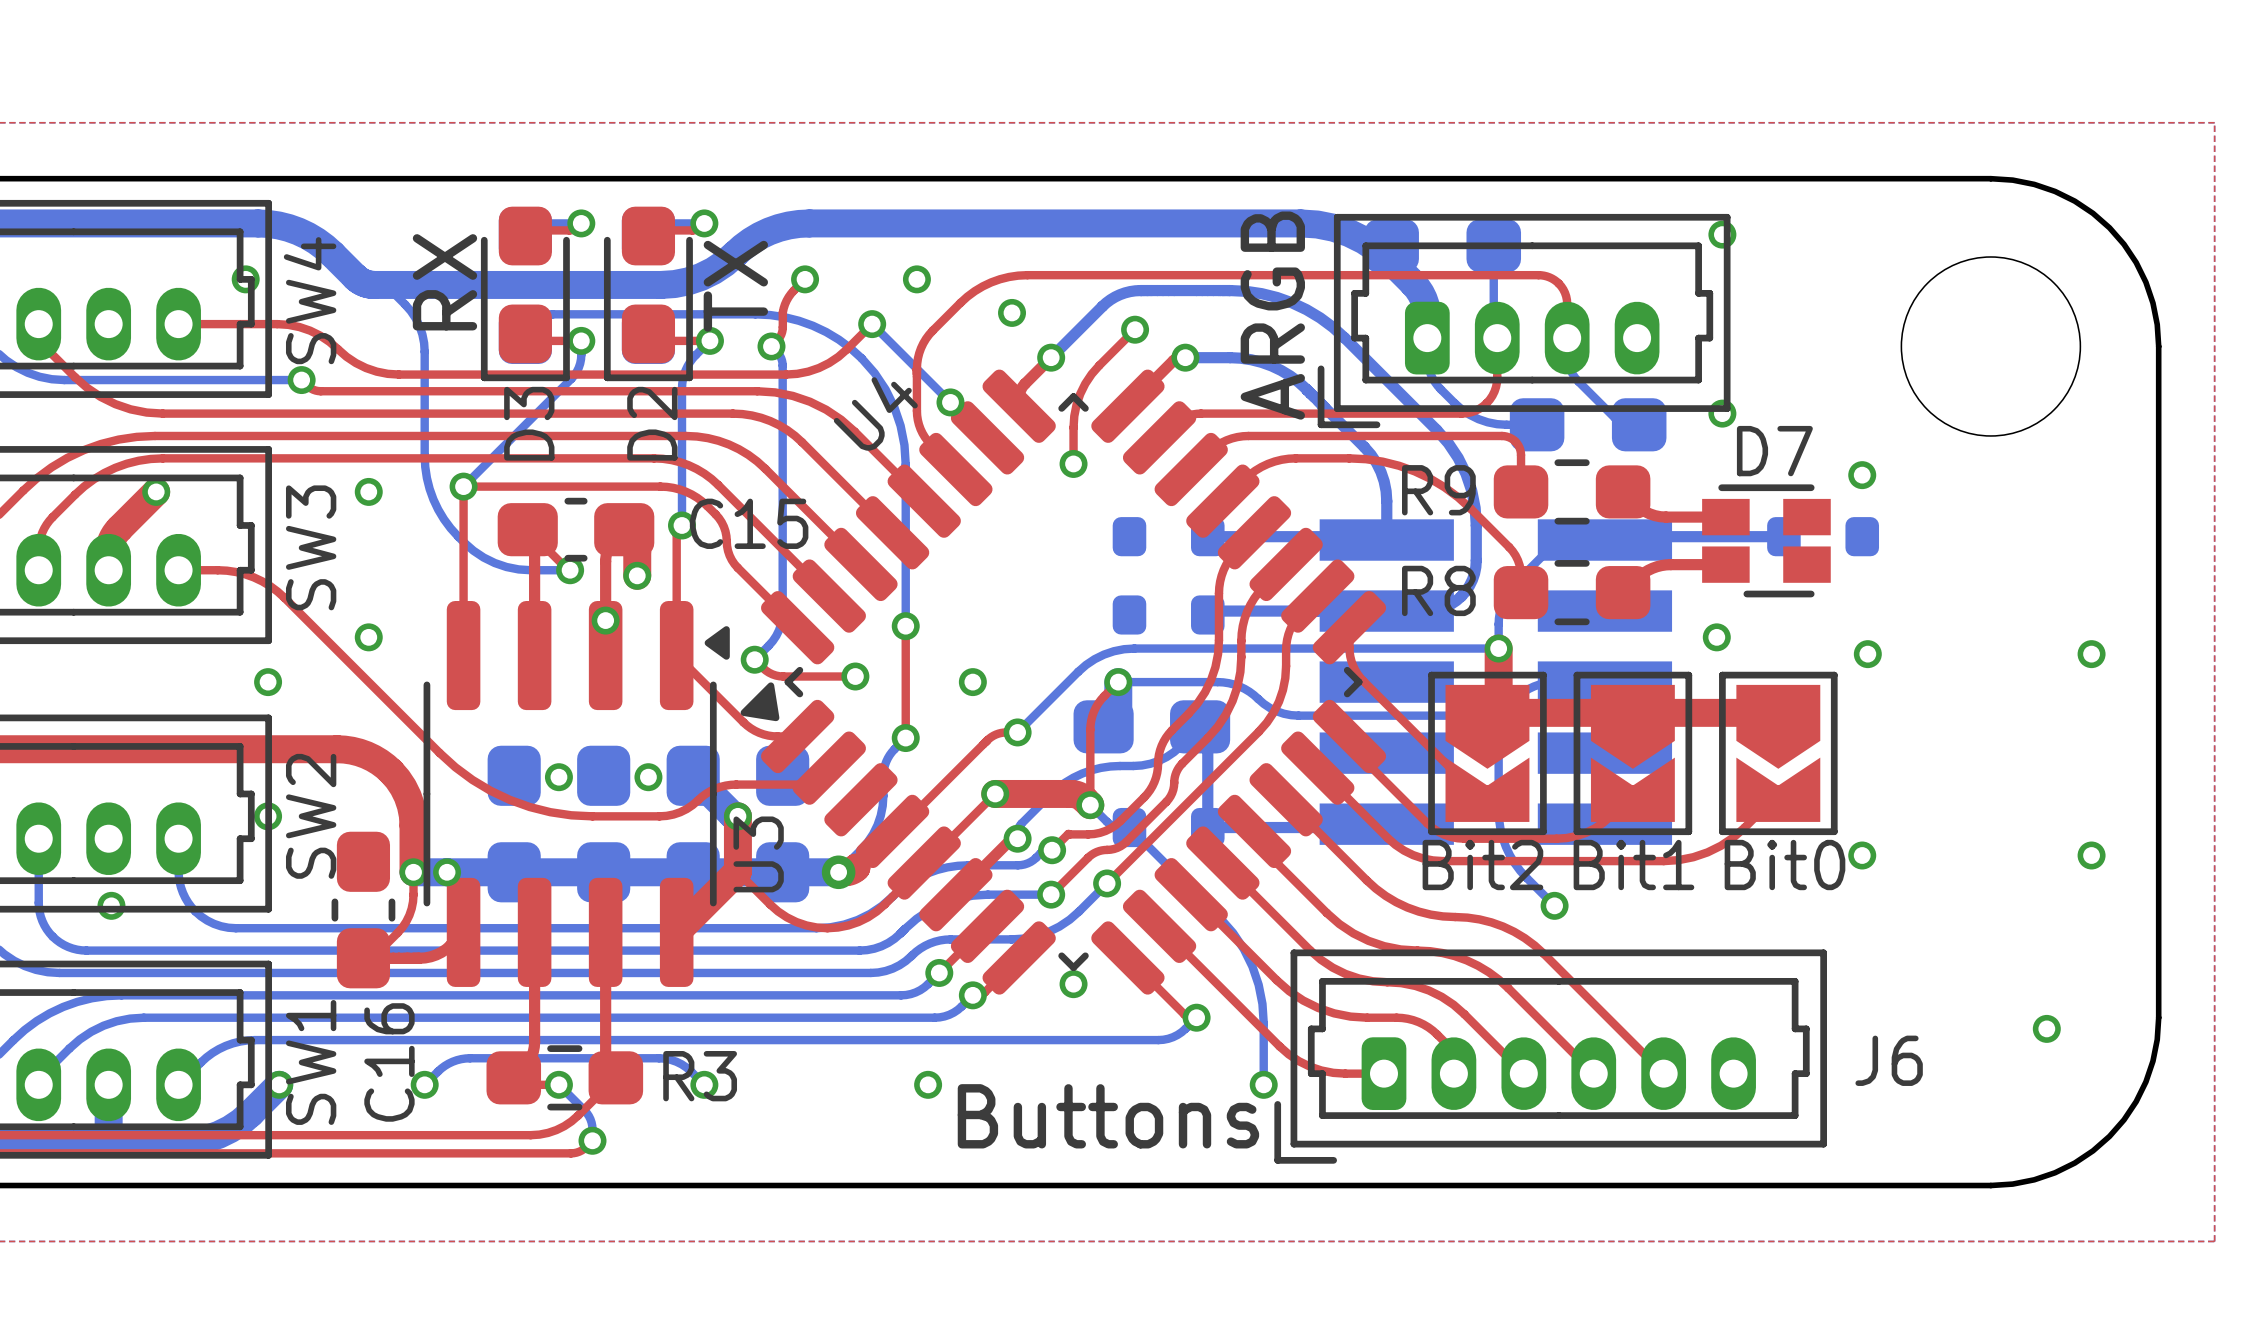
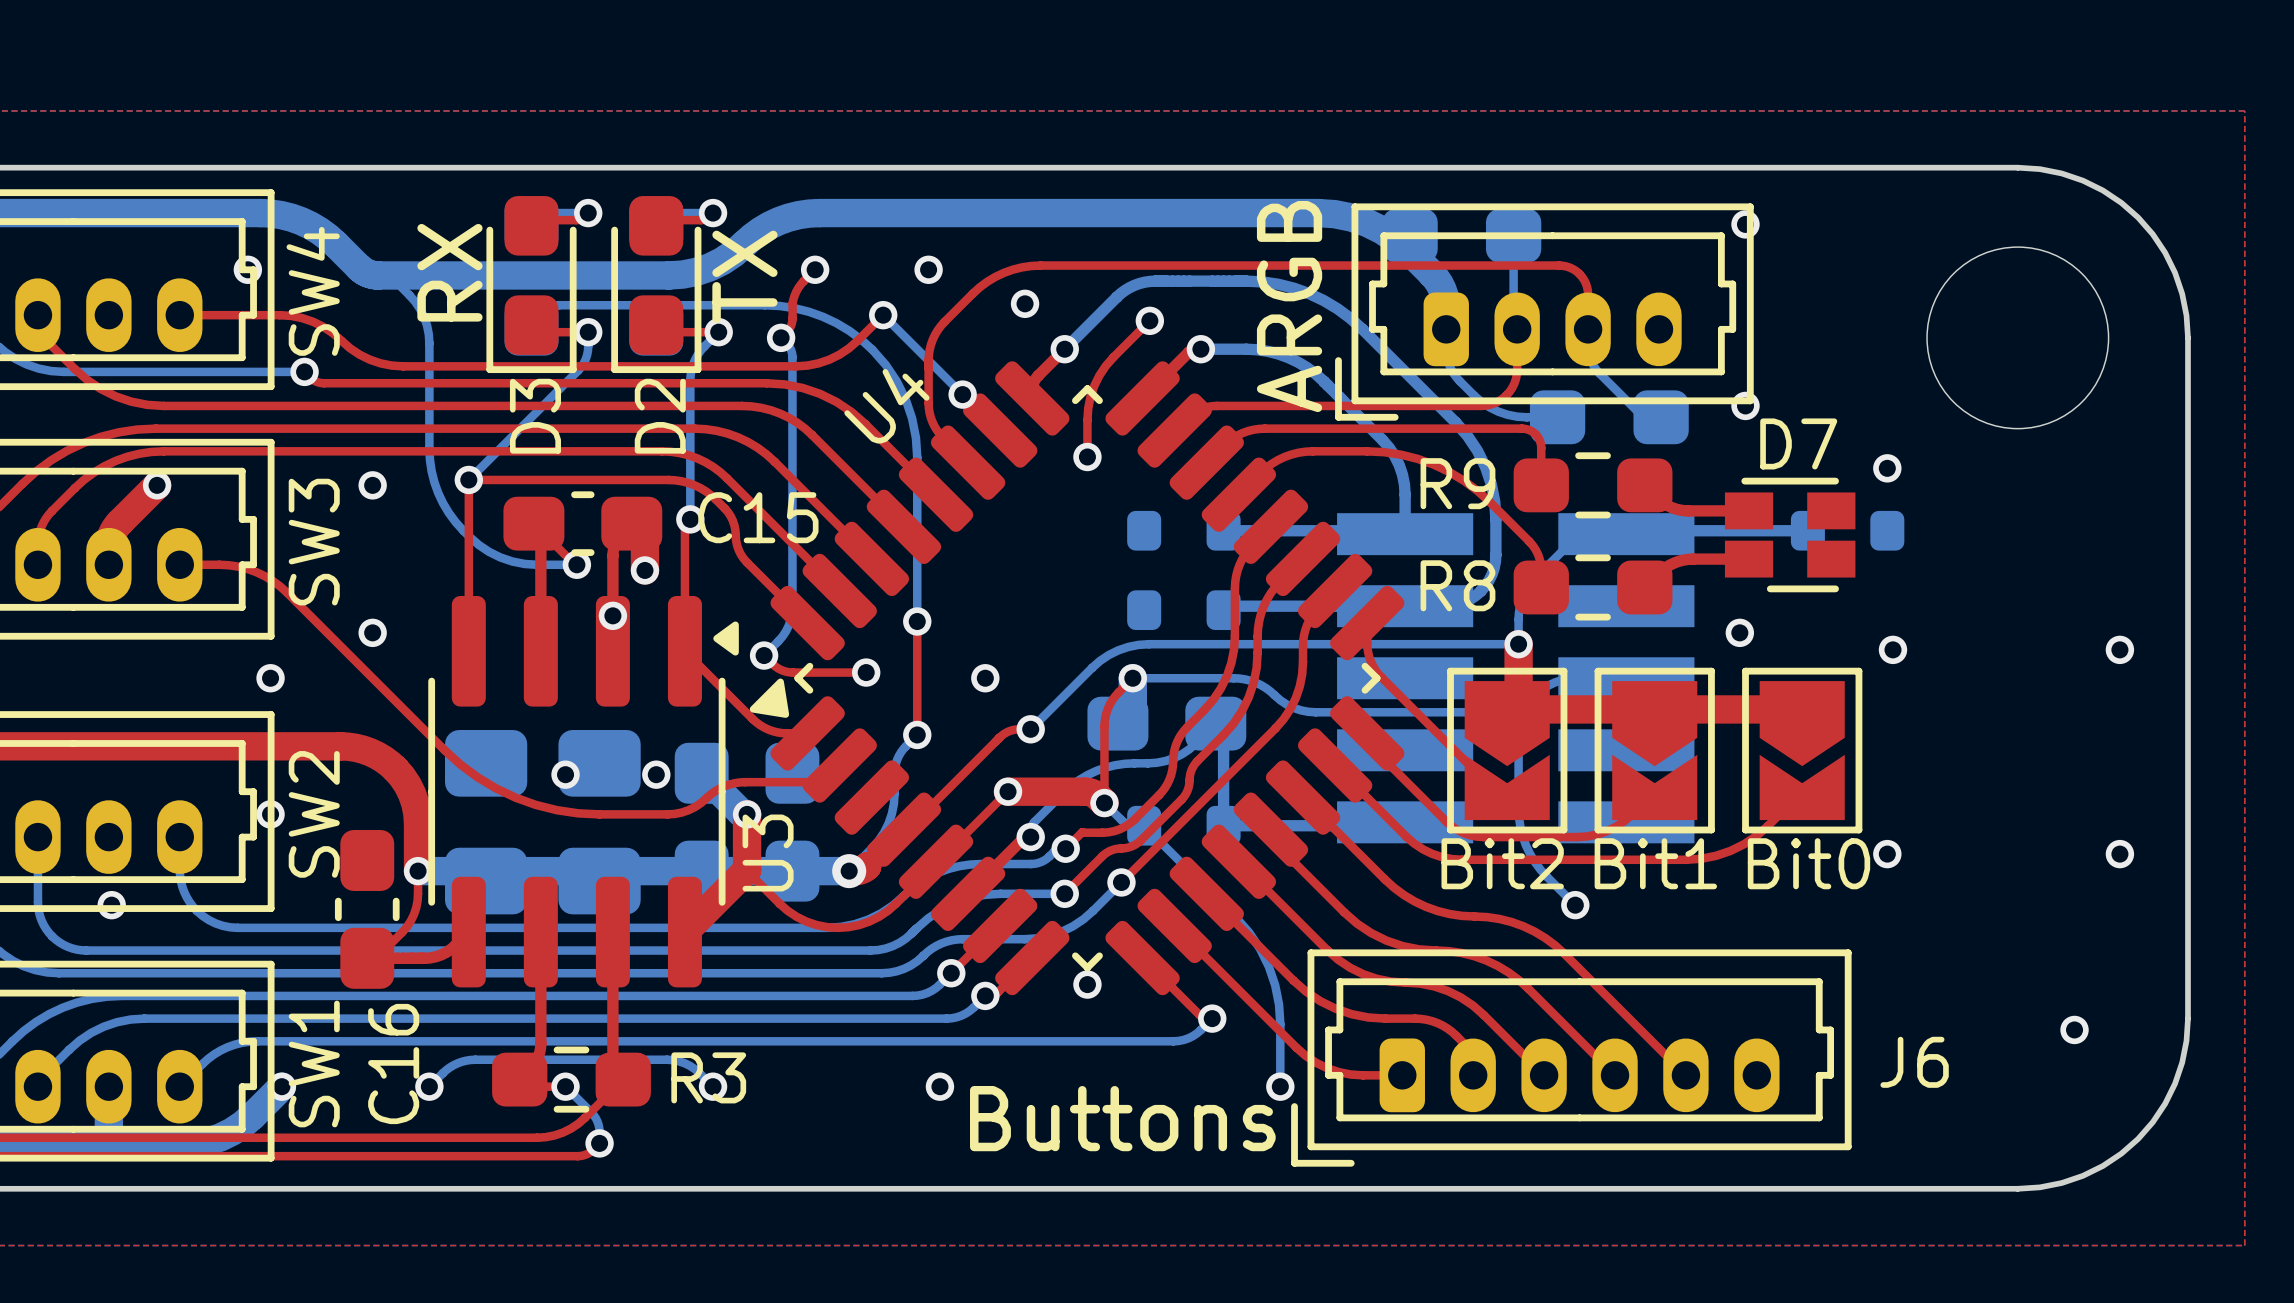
part footprint: [487, 745, 541, 903] -> [444, 730, 528, 915]
part footprint: [577, 745, 631, 903] -> [558, 730, 641, 915]
via: (447, 872) -> none

